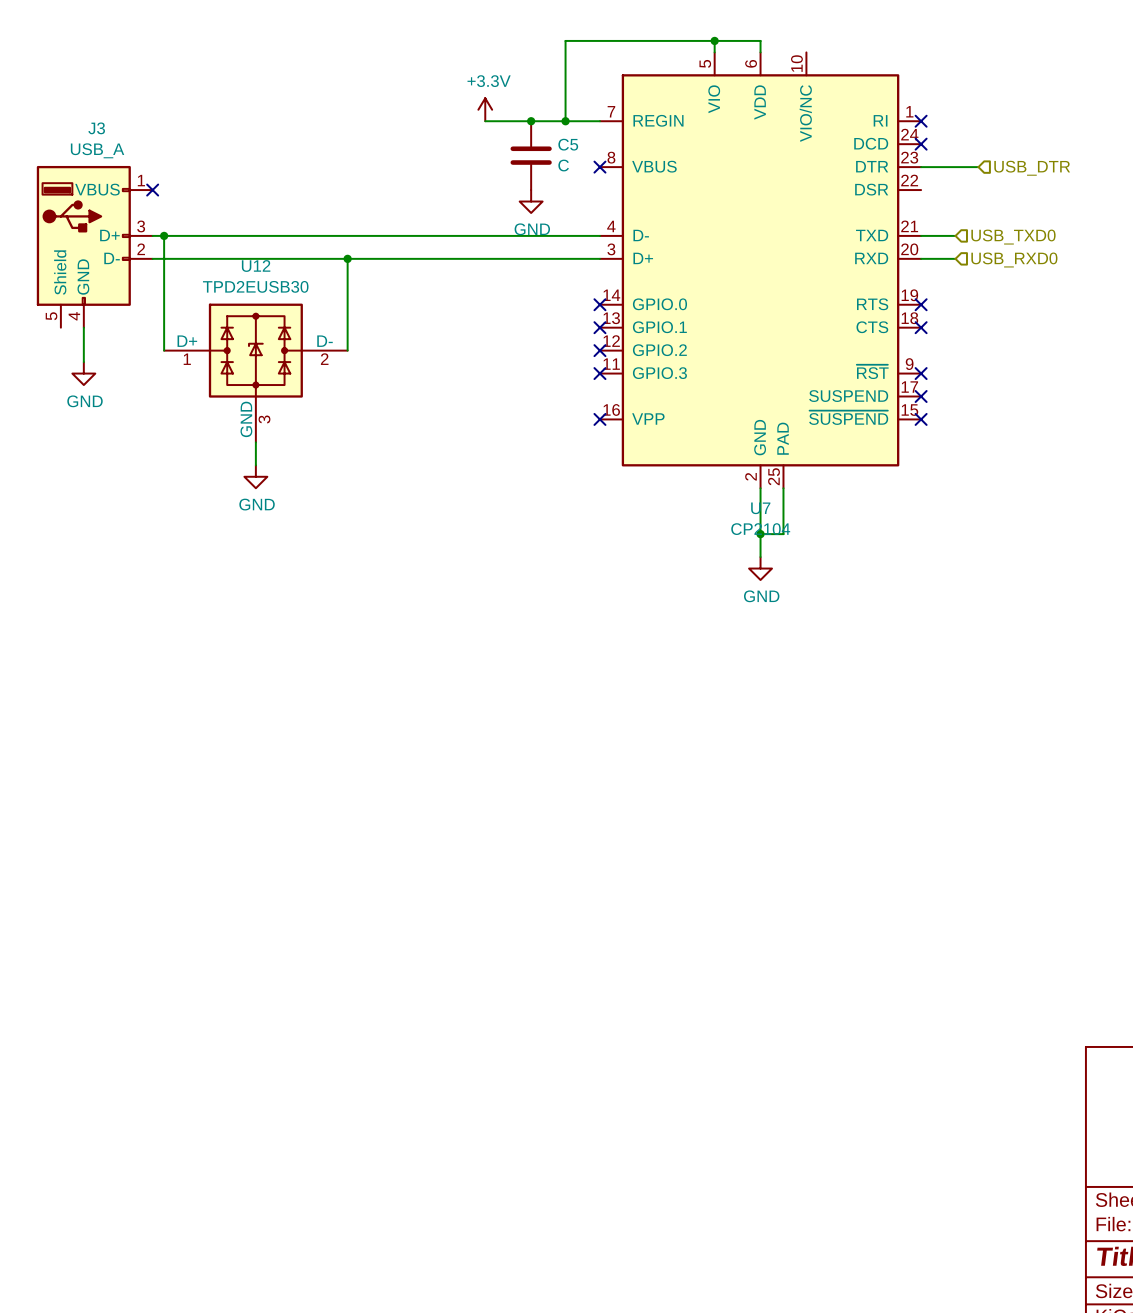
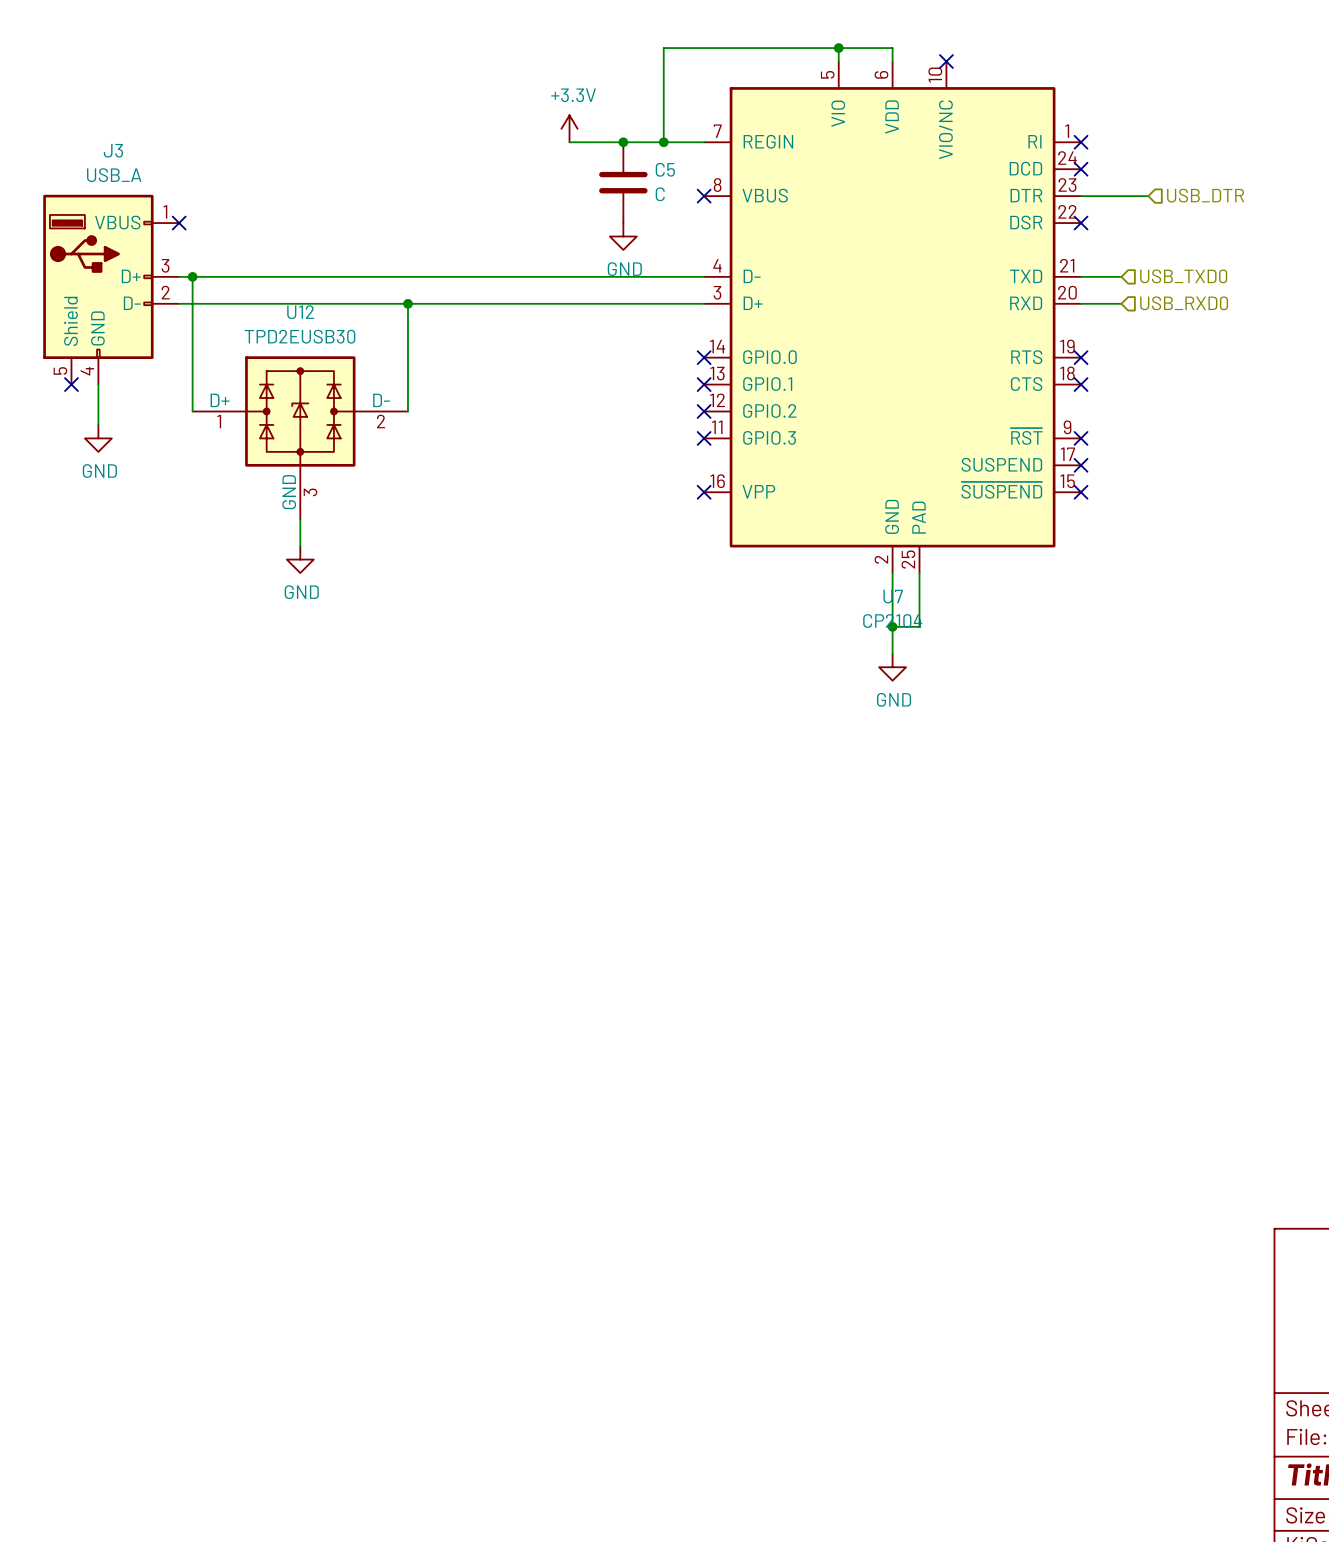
no-connect mark: none -> (946, 61)
no-connect mark: none -> (1081, 223)
no-connect mark: none -> (71, 384)

